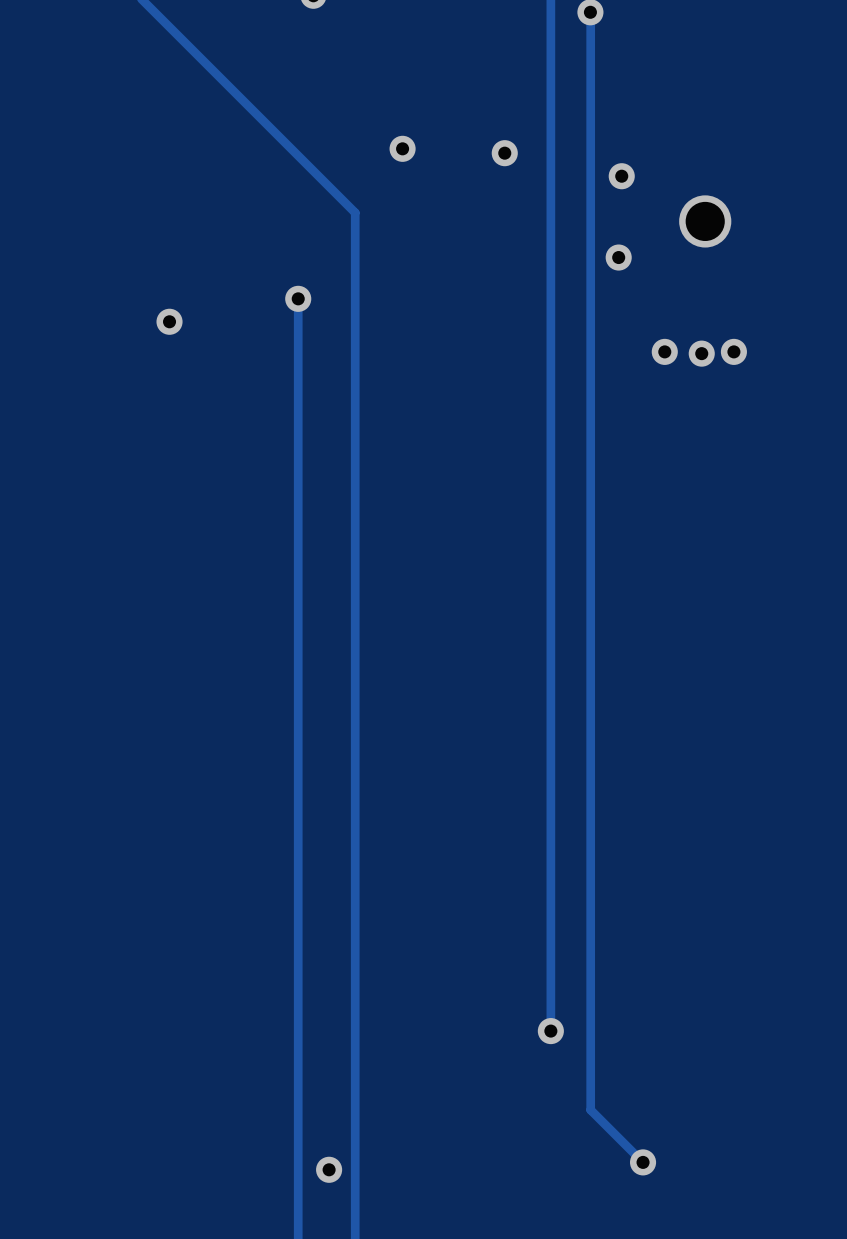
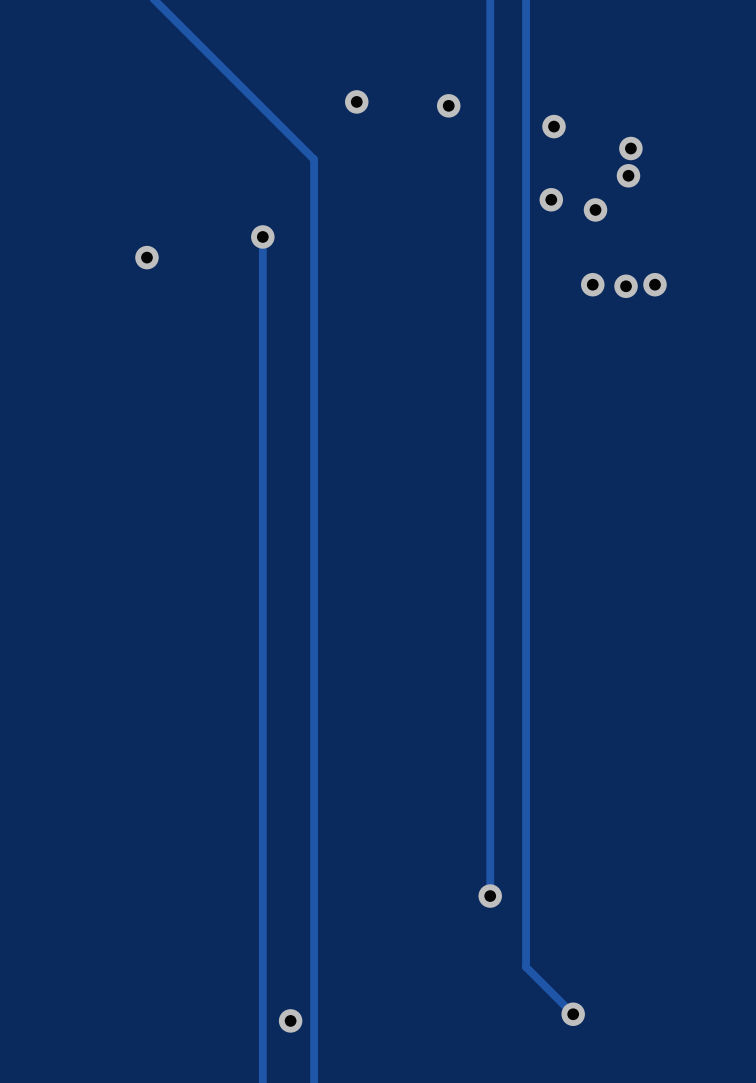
via size: [679, 195, 732, 248] -> [616, 164, 641, 188]
via: none -> (630, 148)
via: none -> (595, 209)

